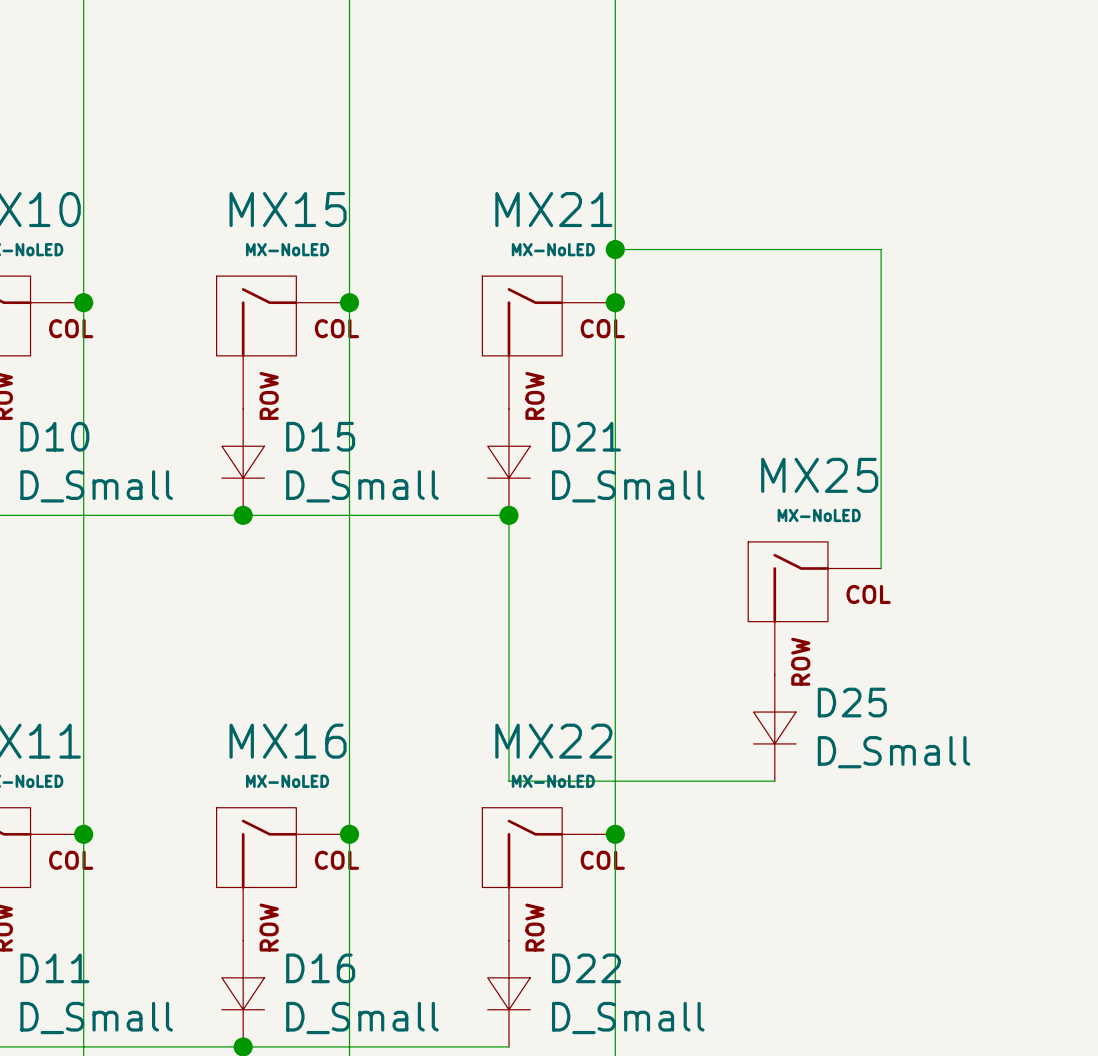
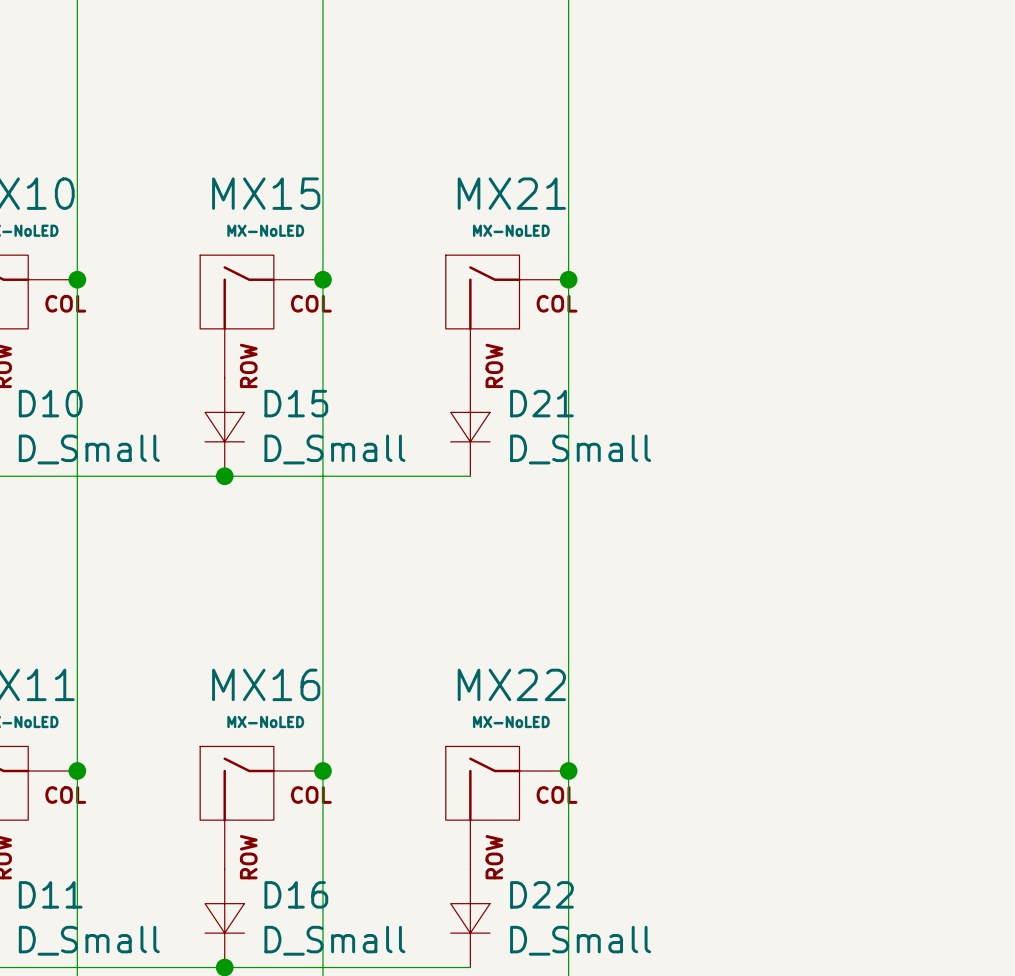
wire: (615, 249) (881, 249) (881, 568) -> none
junction: (615, 249) -> none
wire: (508, 515) (508, 781) (774, 781) -> none
junction: (508, 515) -> none
MX25: MX-NoLED (814, 608) -> none
D25: D_Small (774, 727) -> none

